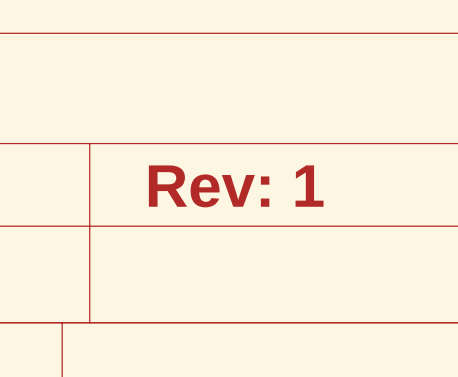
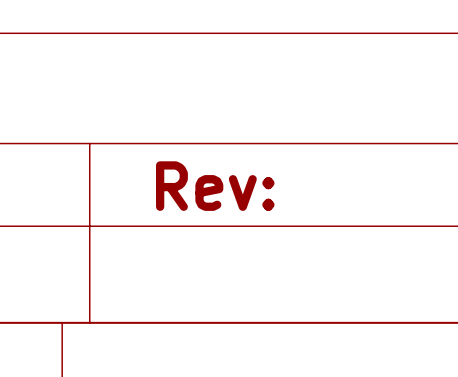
title block: Rev: 1 (236, 186) -> Rev: (215, 186)

